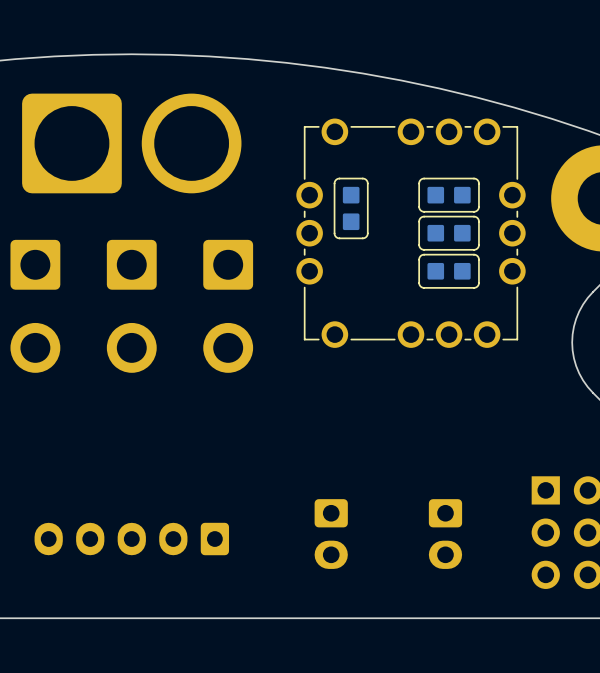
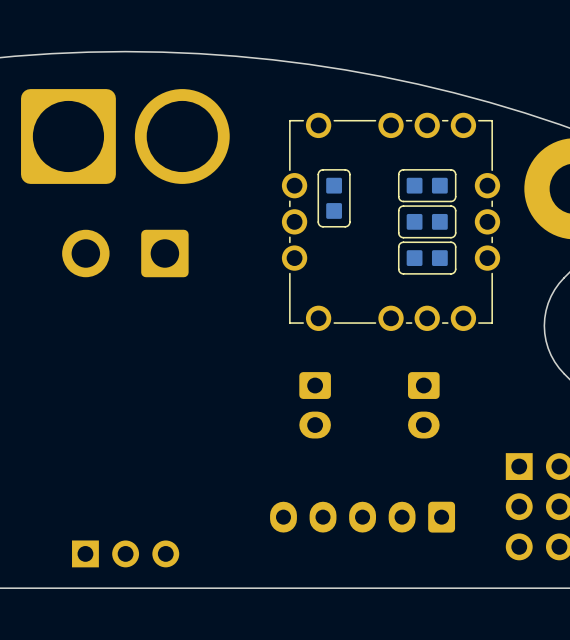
part: (35, 306) -> none
part rotation: 0° (131, 306) -> 90° clockwise (125, 253)
part: (228, 306) -> none
part: none -> (315, 405)
part: none -> (423, 405)
part: (331, 534) -> none
part: (445, 534) -> none
part position: (131, 539) -> (362, 517)
part: none -> (125, 553)

